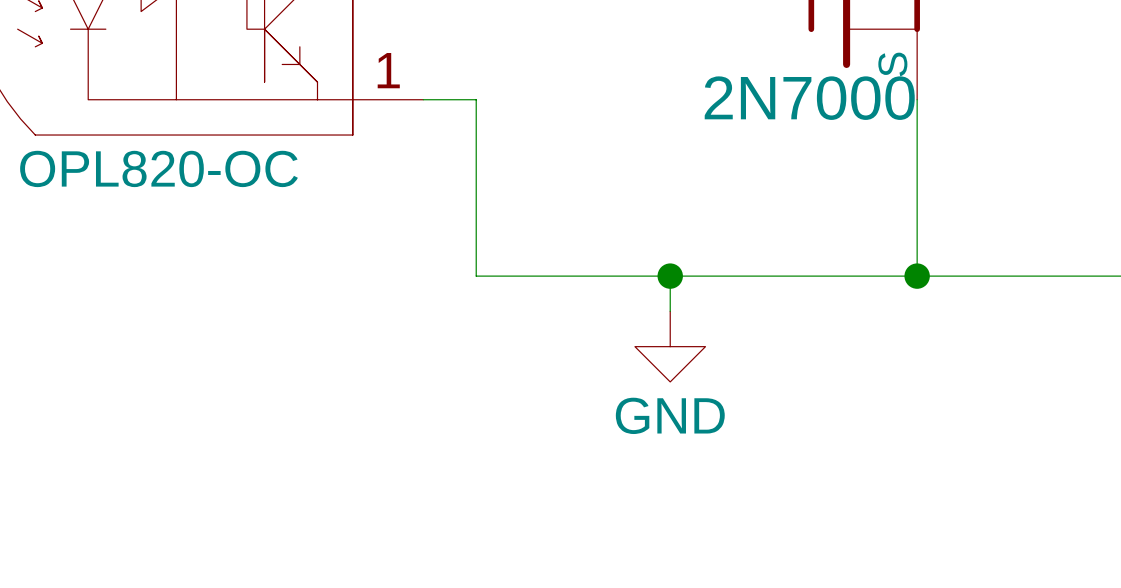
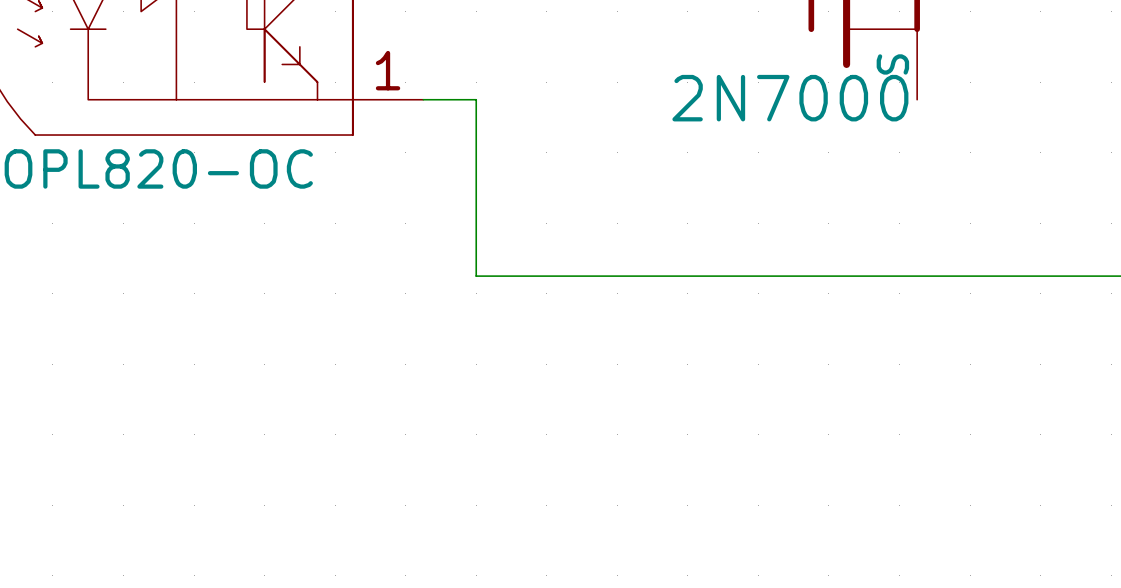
wire: (917, 99) (917, 276) -> none
wire: (670, 276) (670, 311) -> none
junction: (670, 276) -> none
junction: (917, 276) -> none
power symbol: GND (670, 346) -> none

